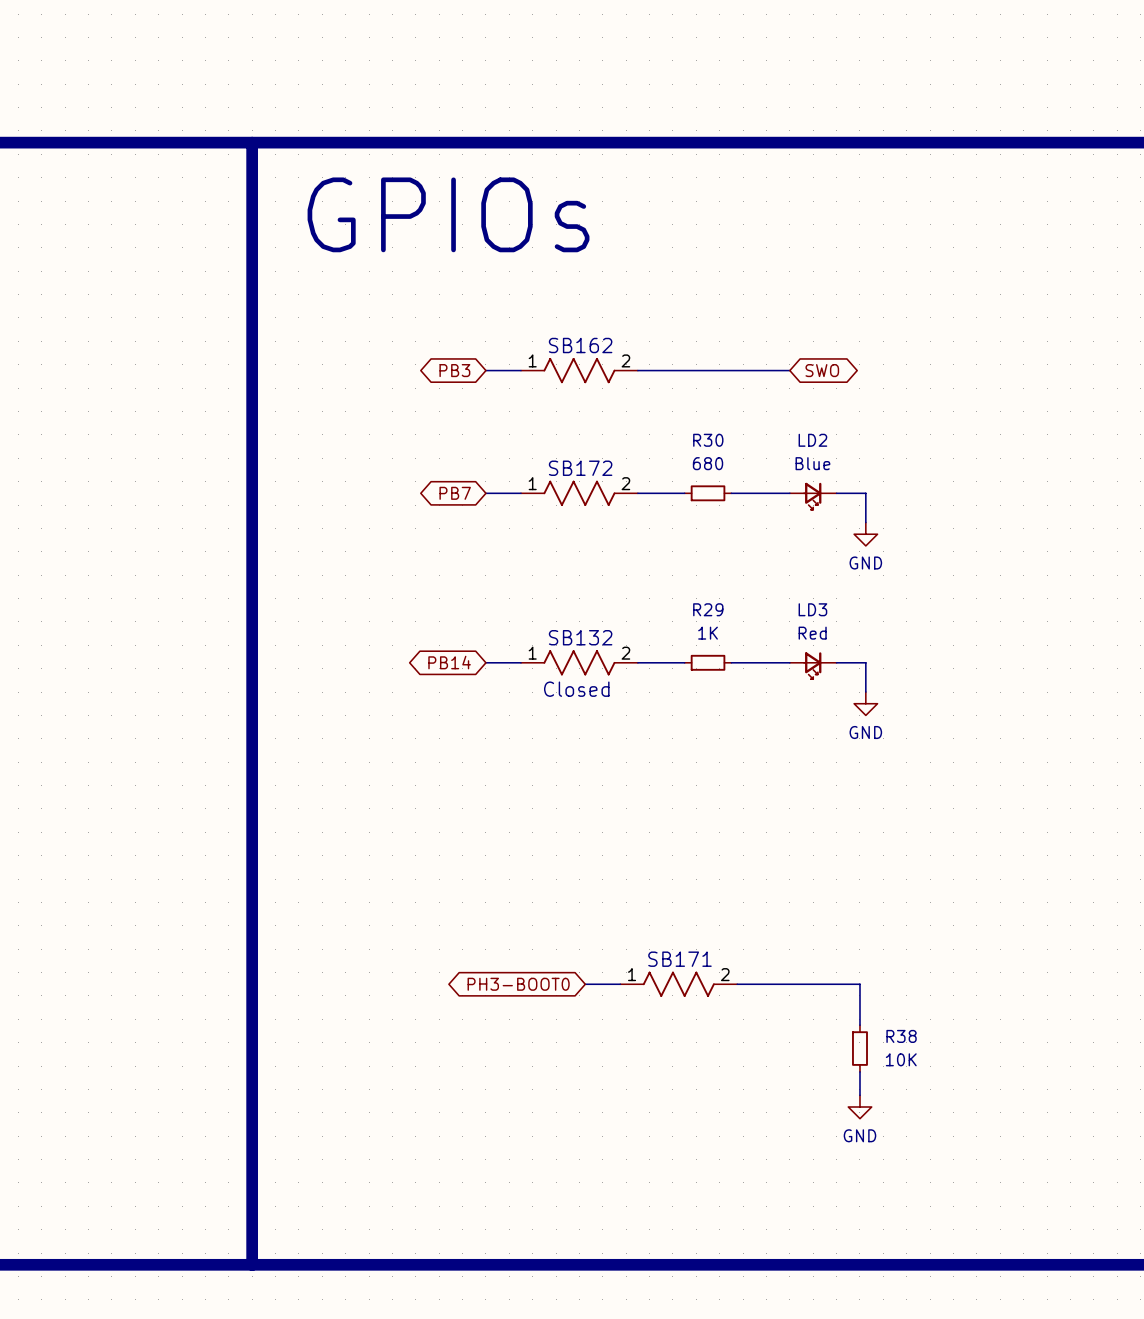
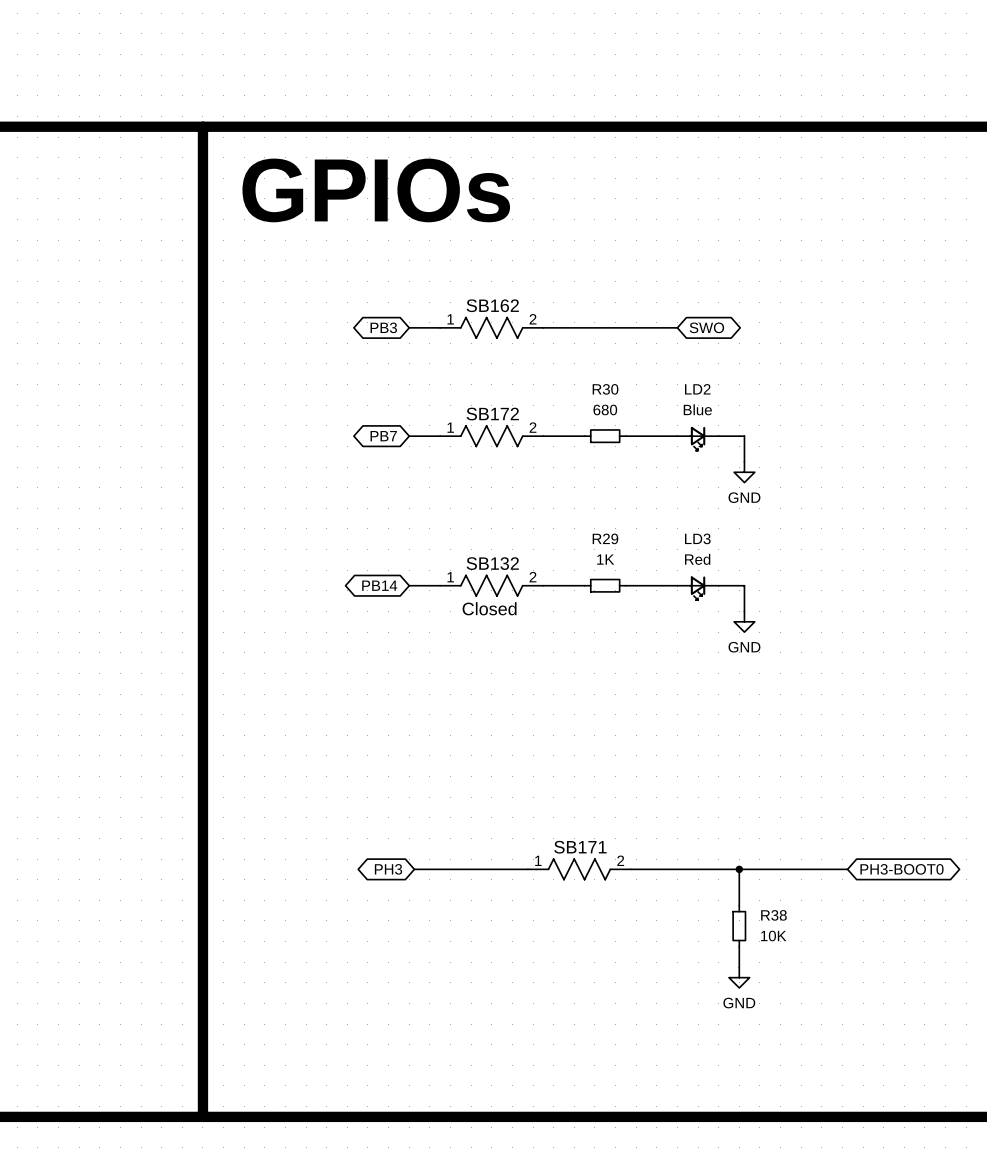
global label: none -> PH3 (388, 869)
wire: none -> (414, 869) (496, 869)
global label: PH3-BOOT0 (518, 984) -> none
wire: none -> (739, 869) (847, 869)
junction: none -> (739, 869)
global label: none -> PH3-BOOT0 (902, 869)

